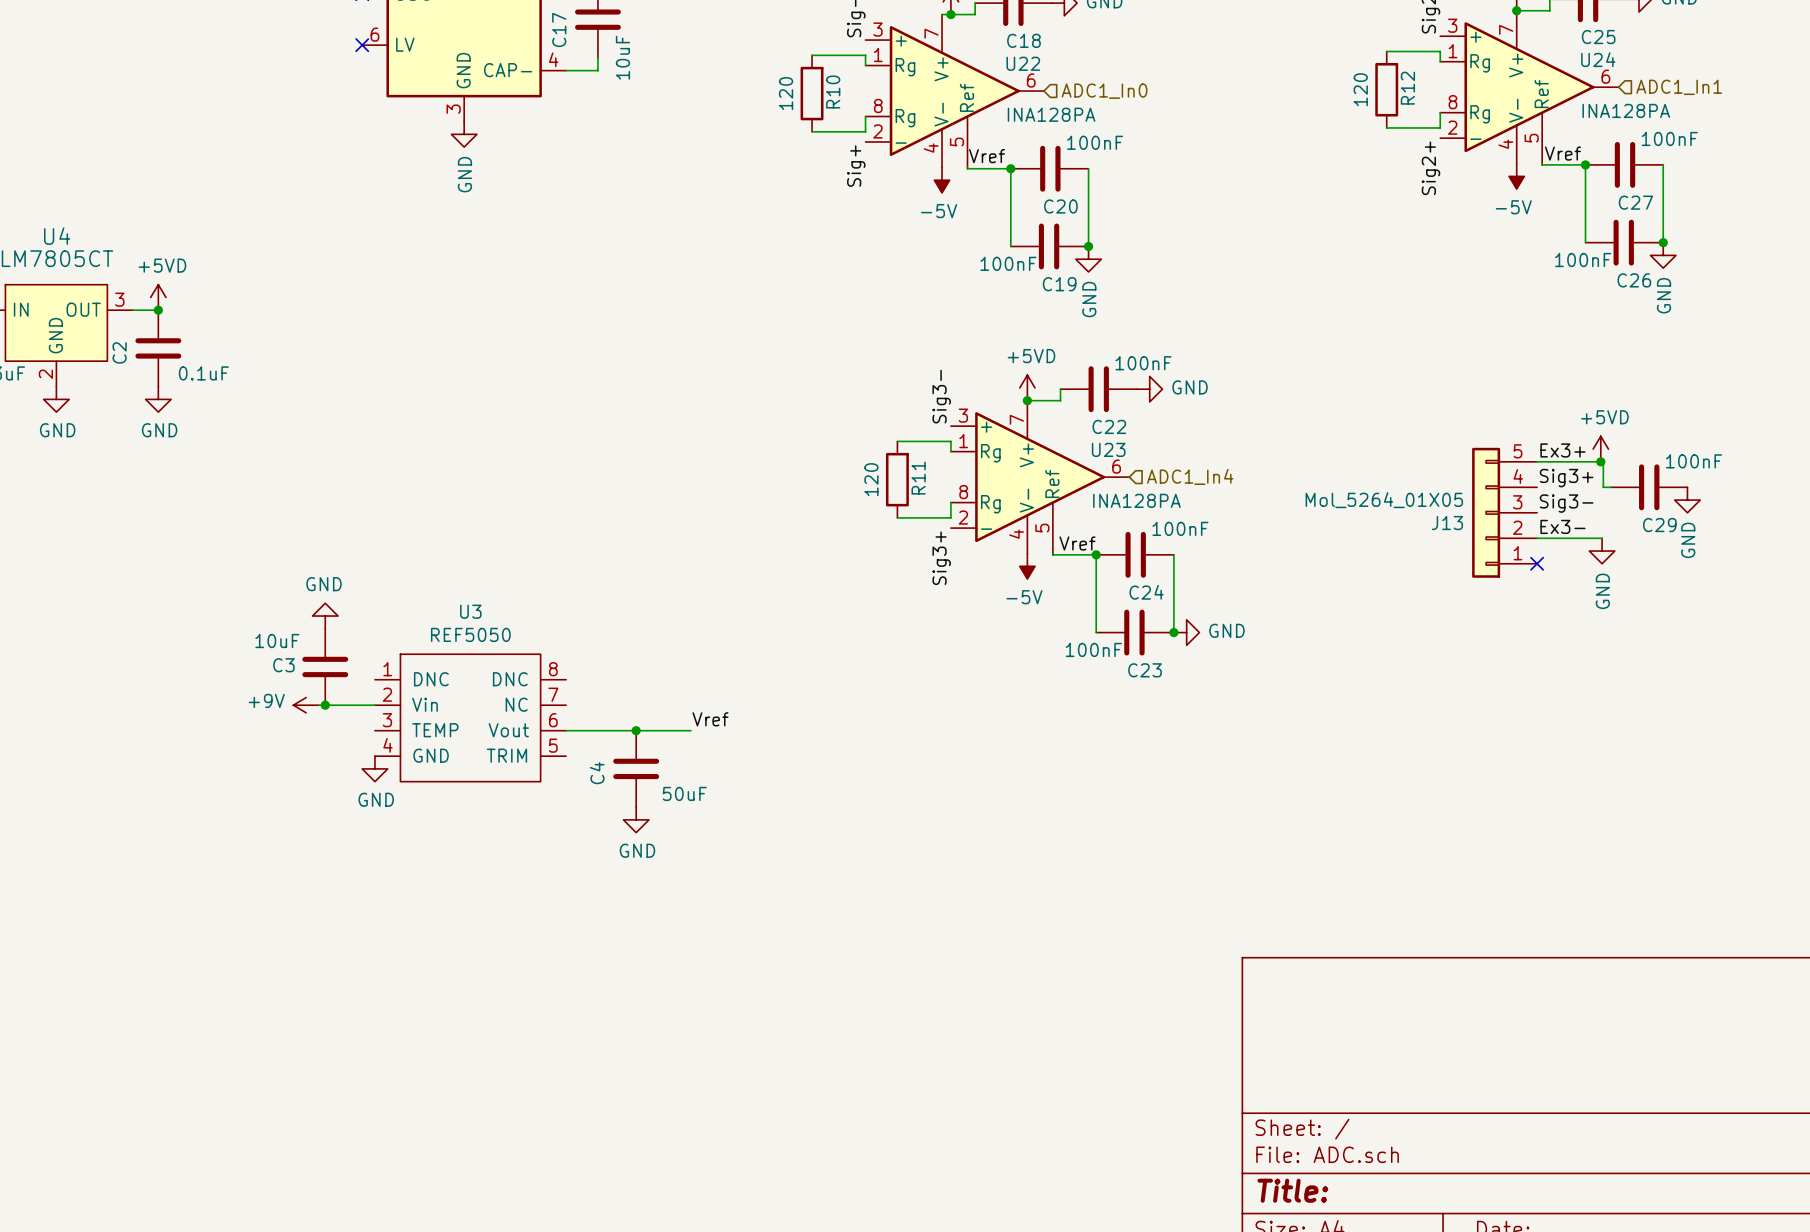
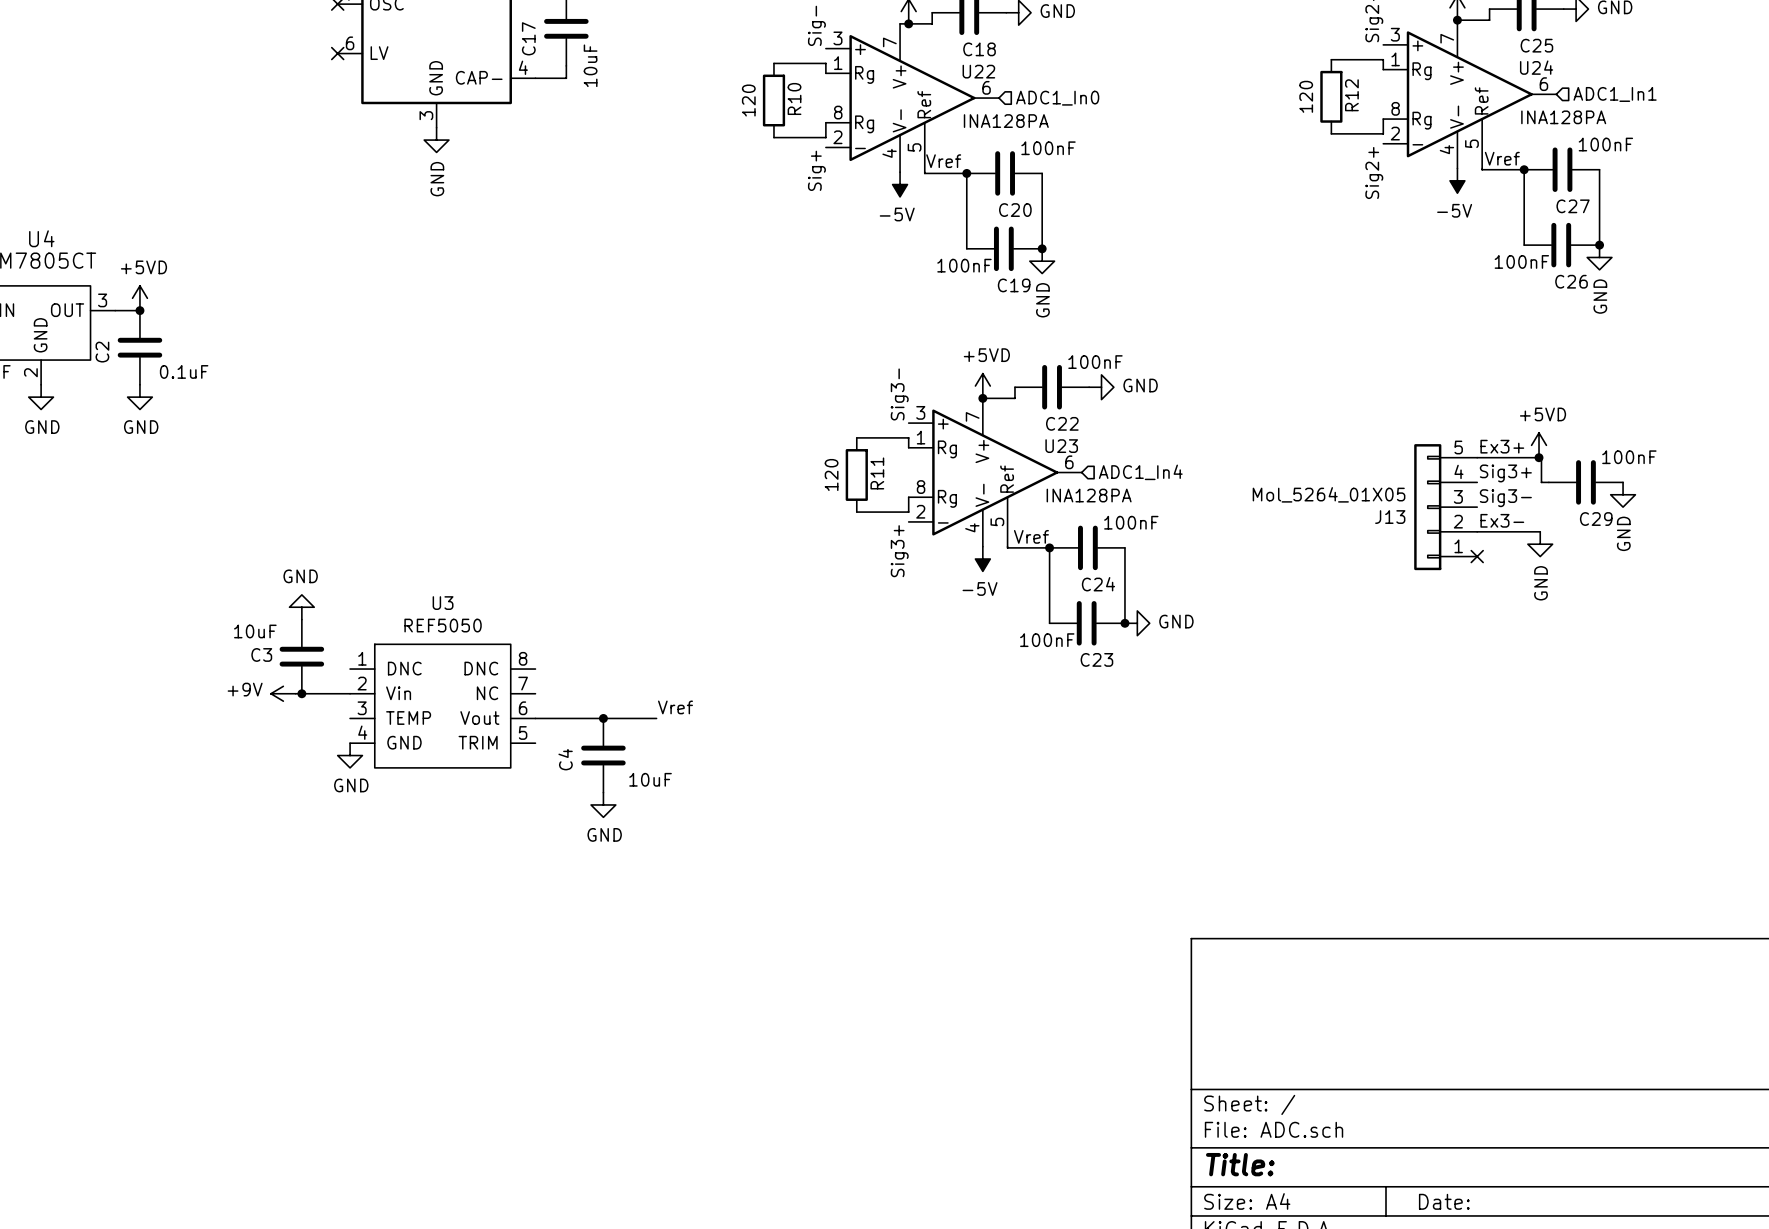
C4 value: 50uF (684, 793) -> 10uF (650, 779)

